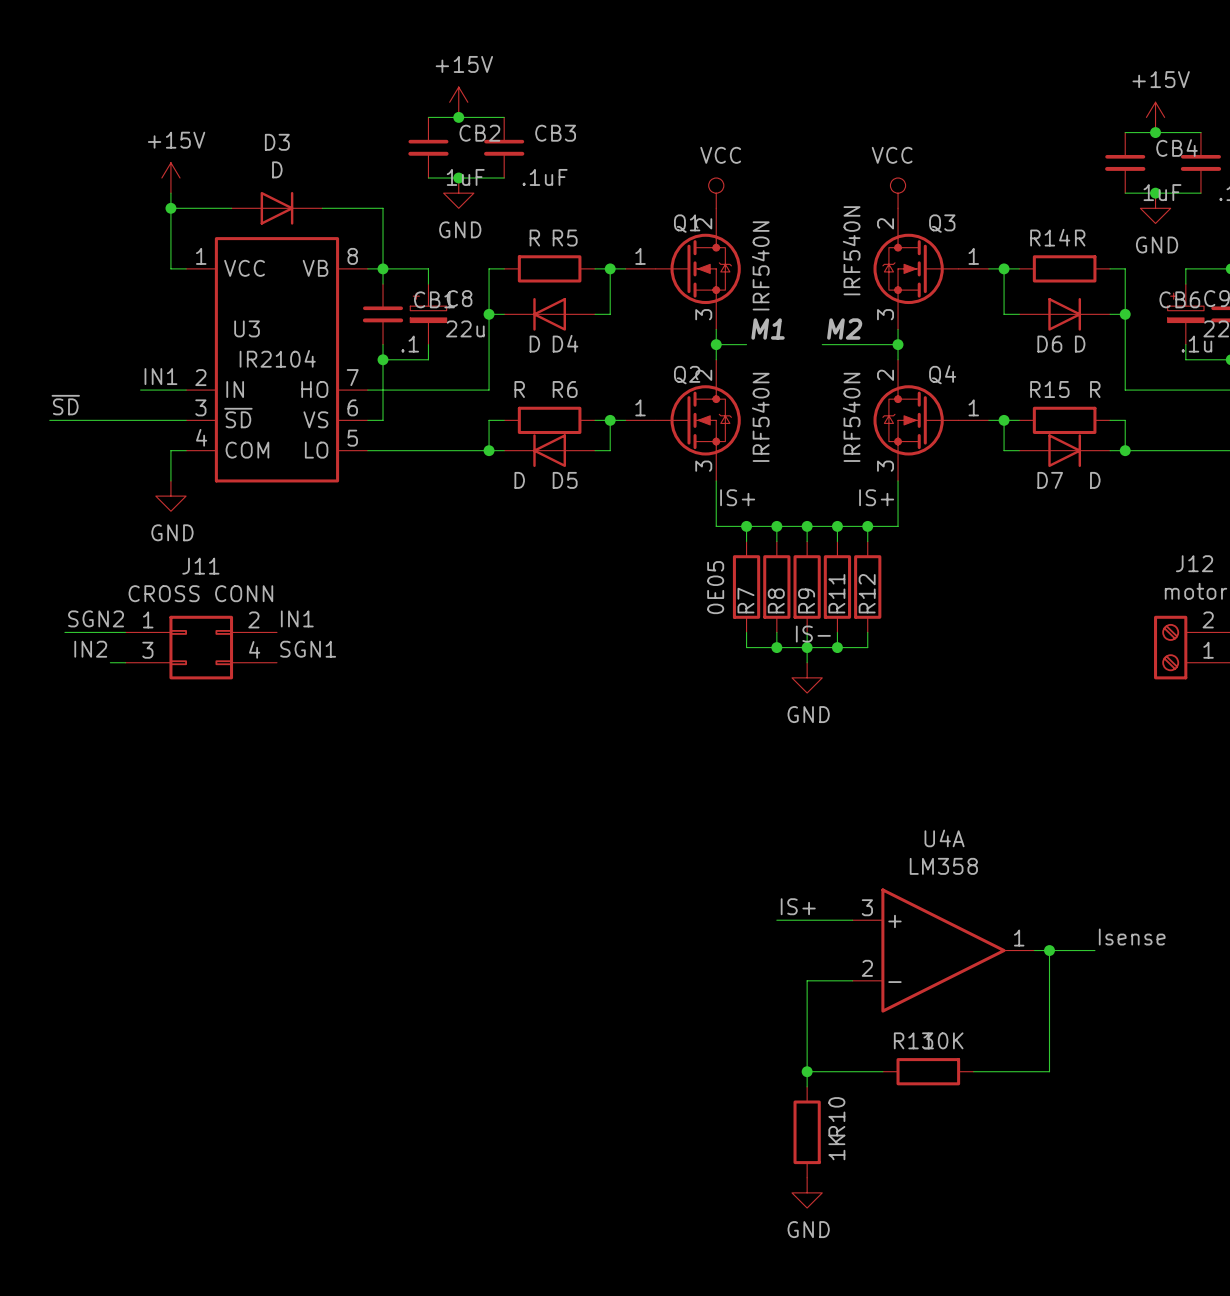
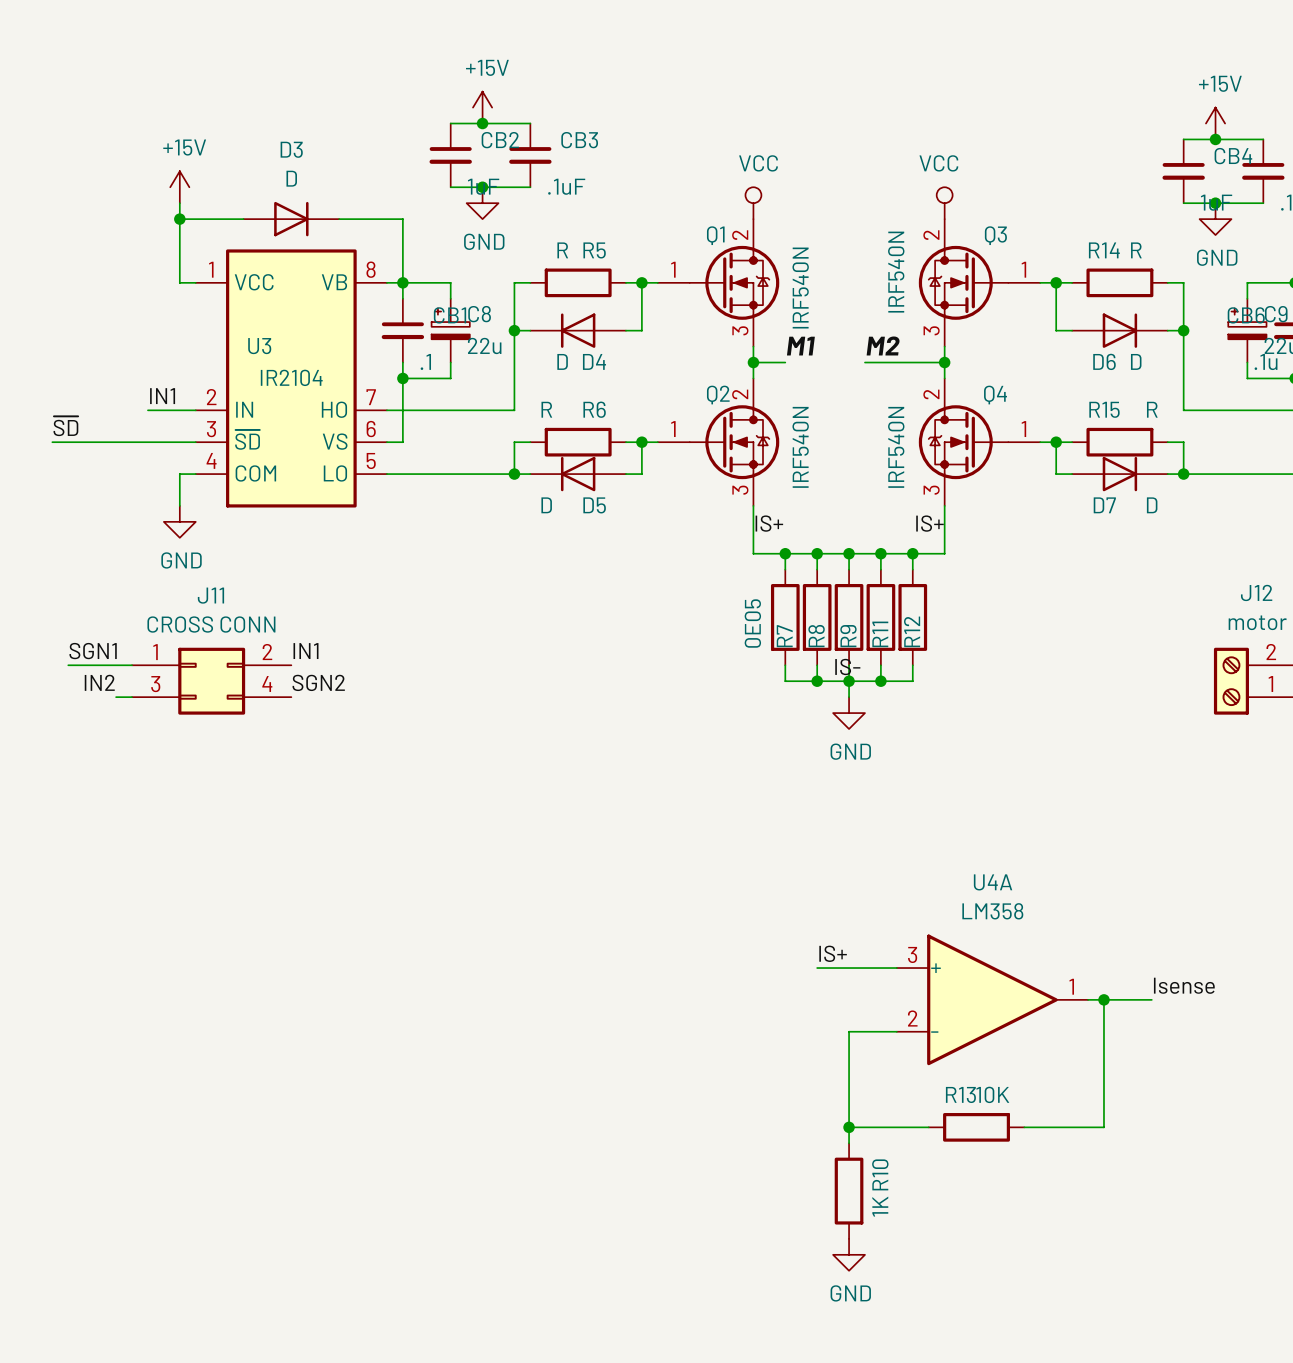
label: SGN2 (96, 618) -> SGN1 (93, 651)
label: SGN1 (308, 649) -> SGN2 (318, 682)

